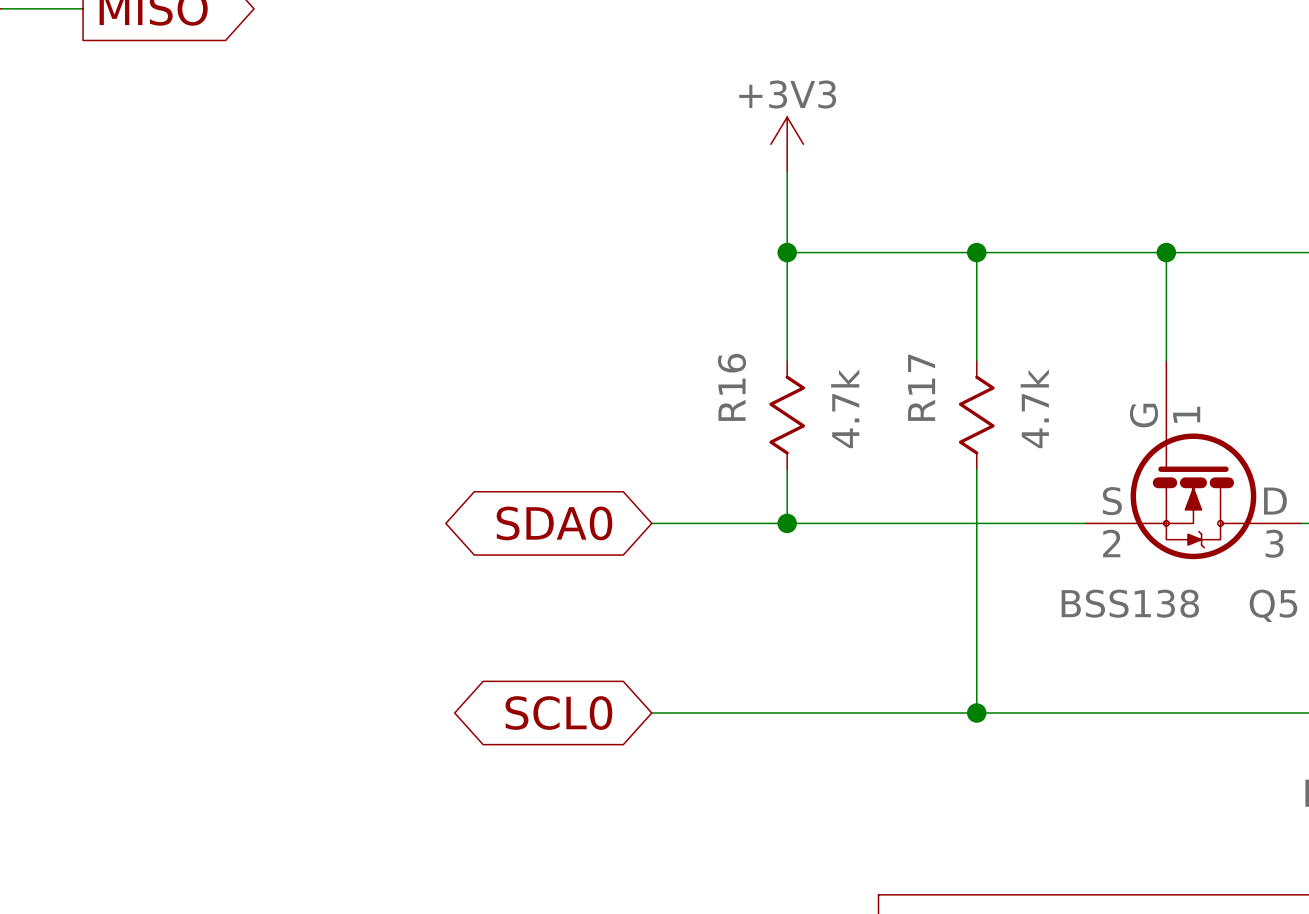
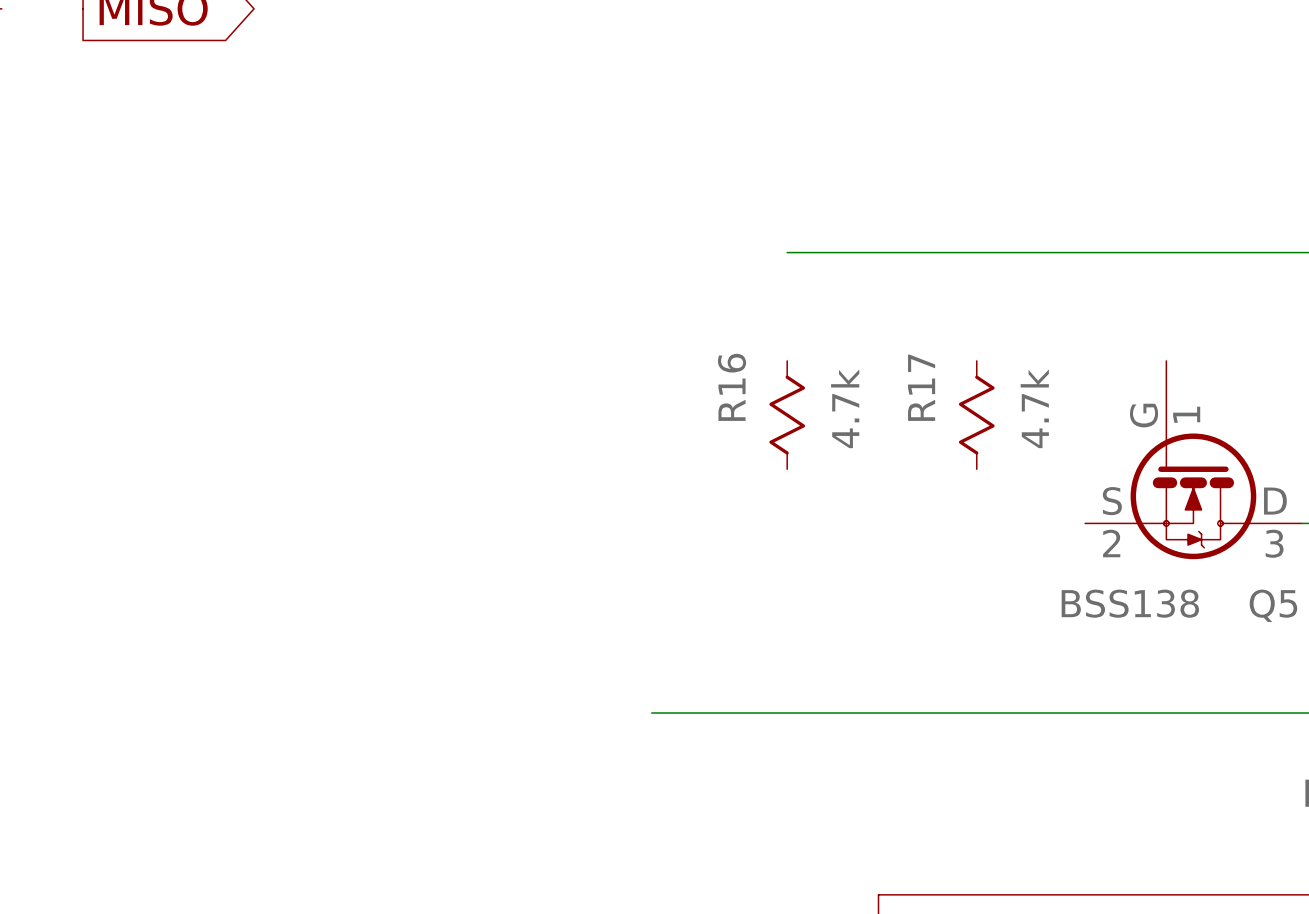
wire: (1, 8) (83, 8) -> none
power symbol: +3V3 (787, 144) -> none
wire: (787, 171) (787, 360) -> none
junction: (787, 252) -> none
wire: (976, 252) (976, 360) -> none
junction: (976, 252) -> none
wire: (1166, 252) (1166, 360) -> none
junction: (1166, 252) -> none
wire: (787, 469) (787, 523) -> none
wire: (976, 469) (976, 713) -> none
global label: SDA0 (554, 523) -> none
wire: (651, 523) (1085, 523) -> none
junction: (787, 523) -> none
global label: SCL0 (558, 713) -> none
junction: (976, 713) -> none

